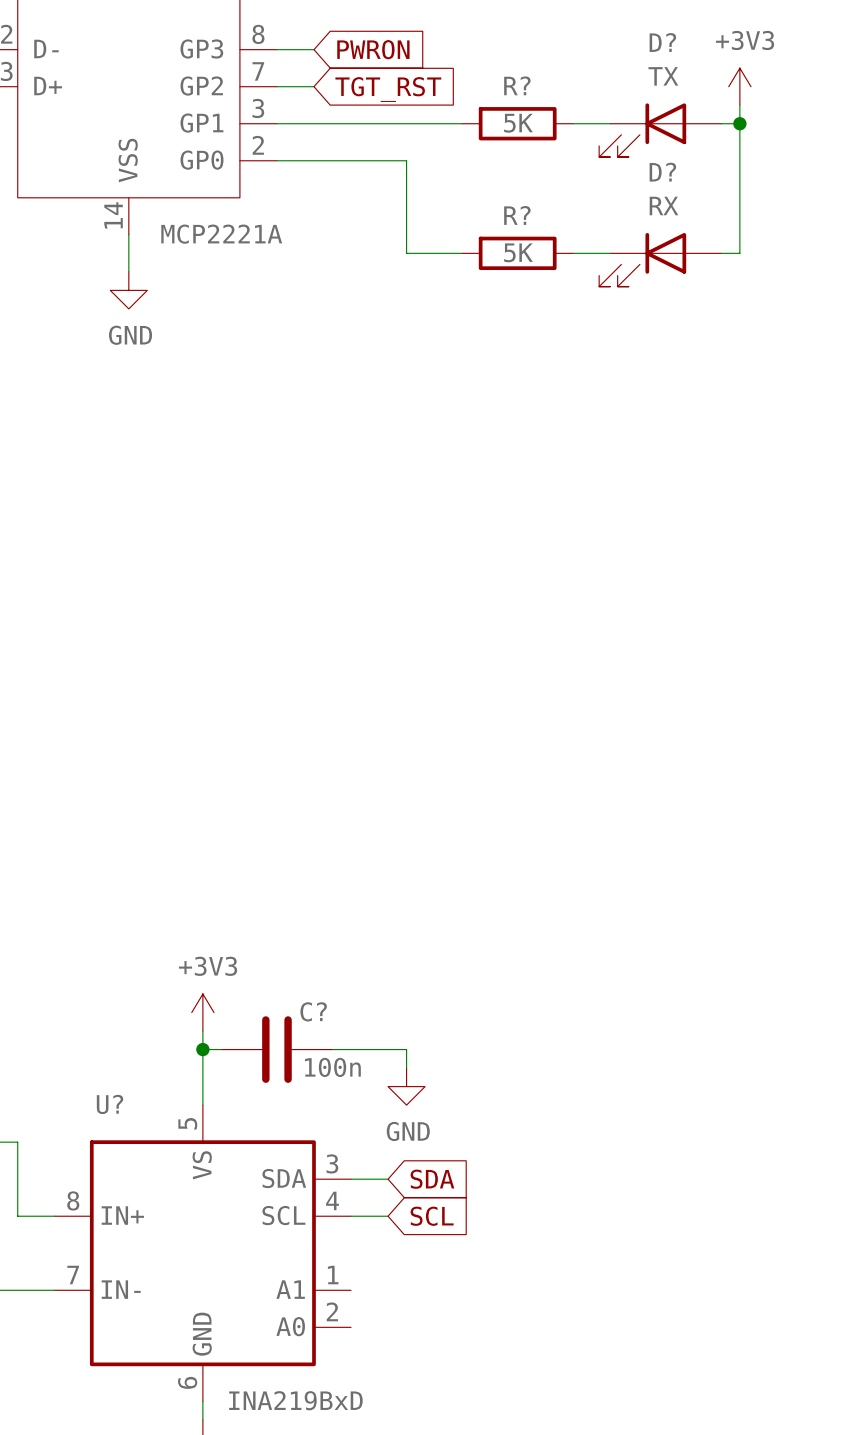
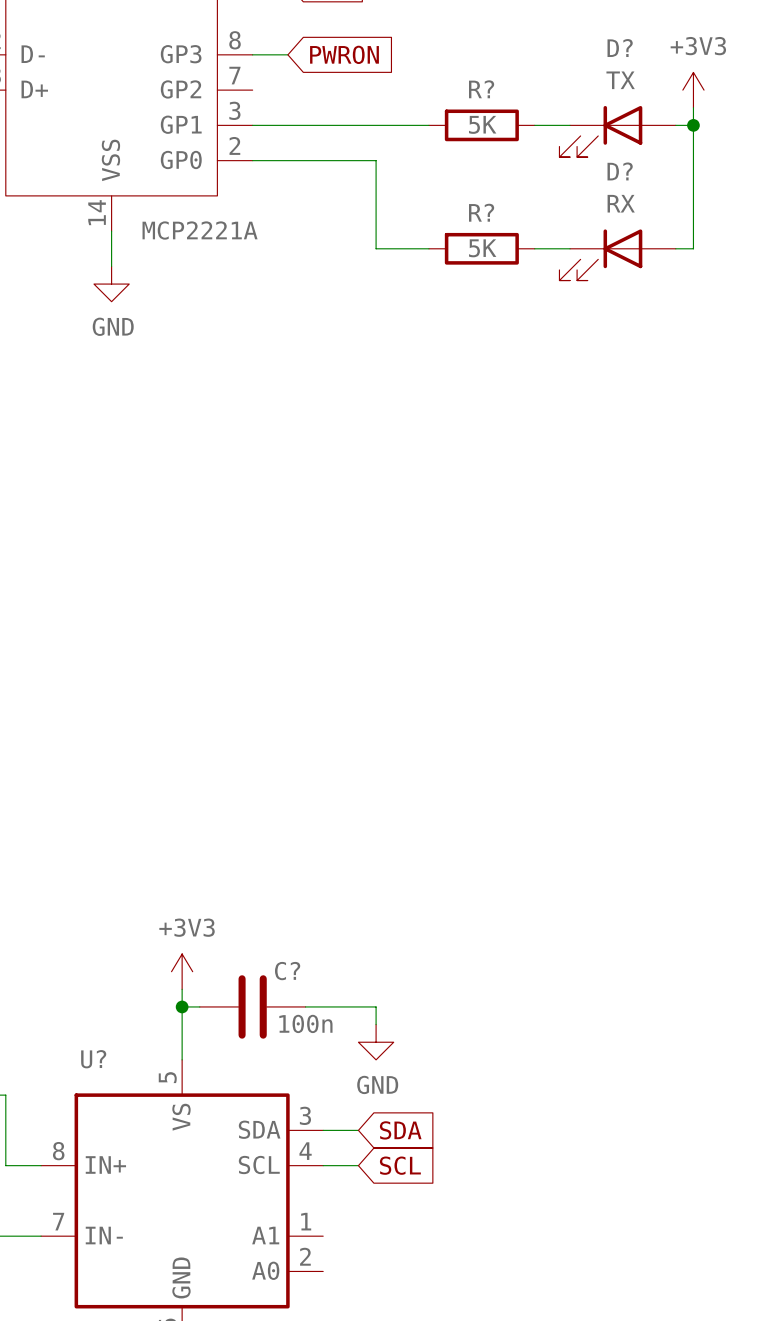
wire: (276, 86) (313, 86) -> none
global label: TGT_RST (388, 89) -> none

